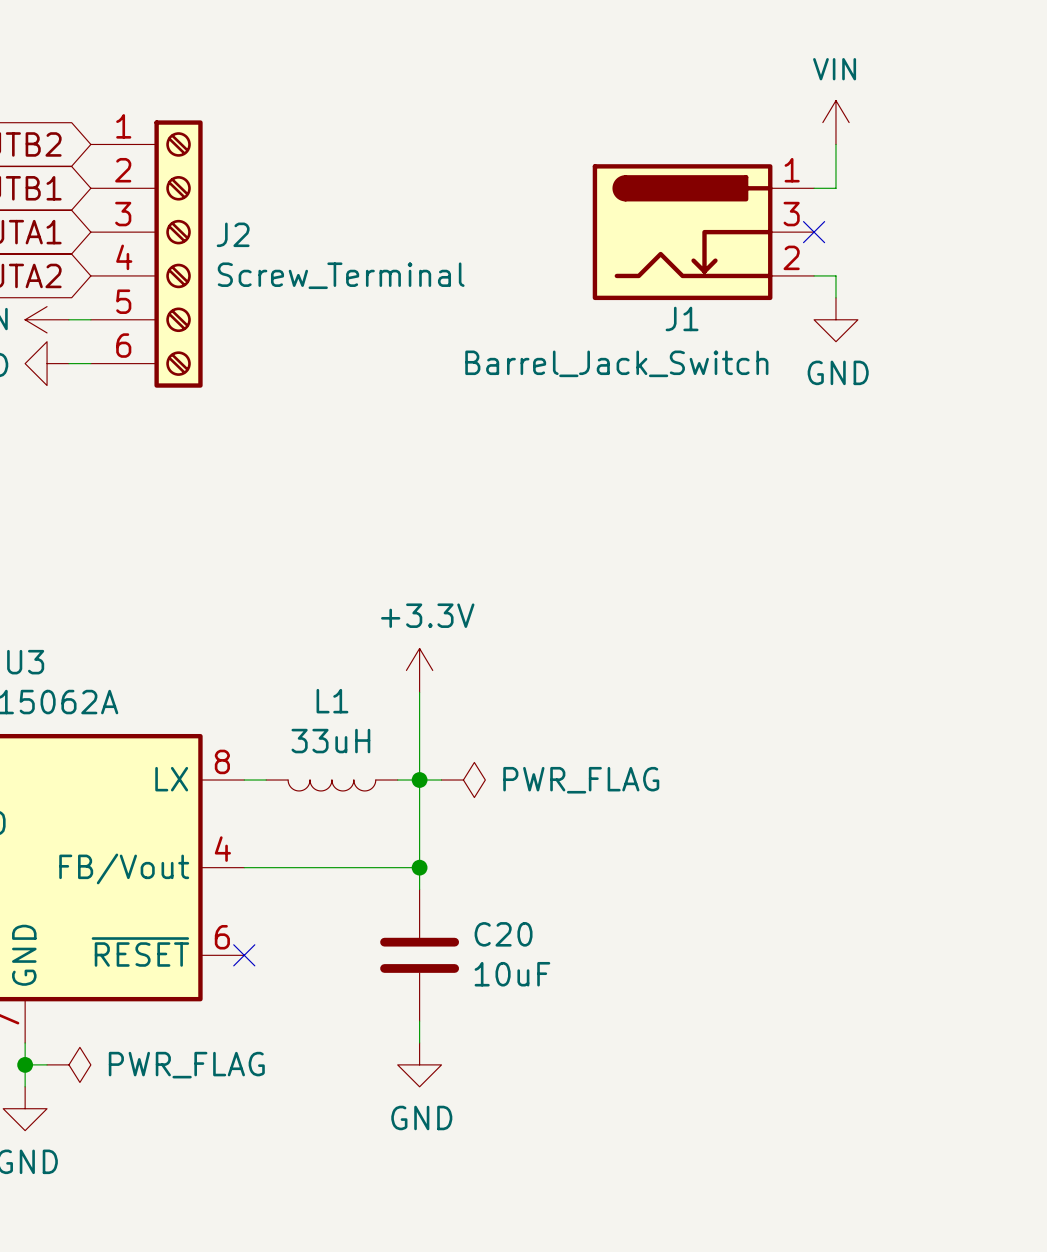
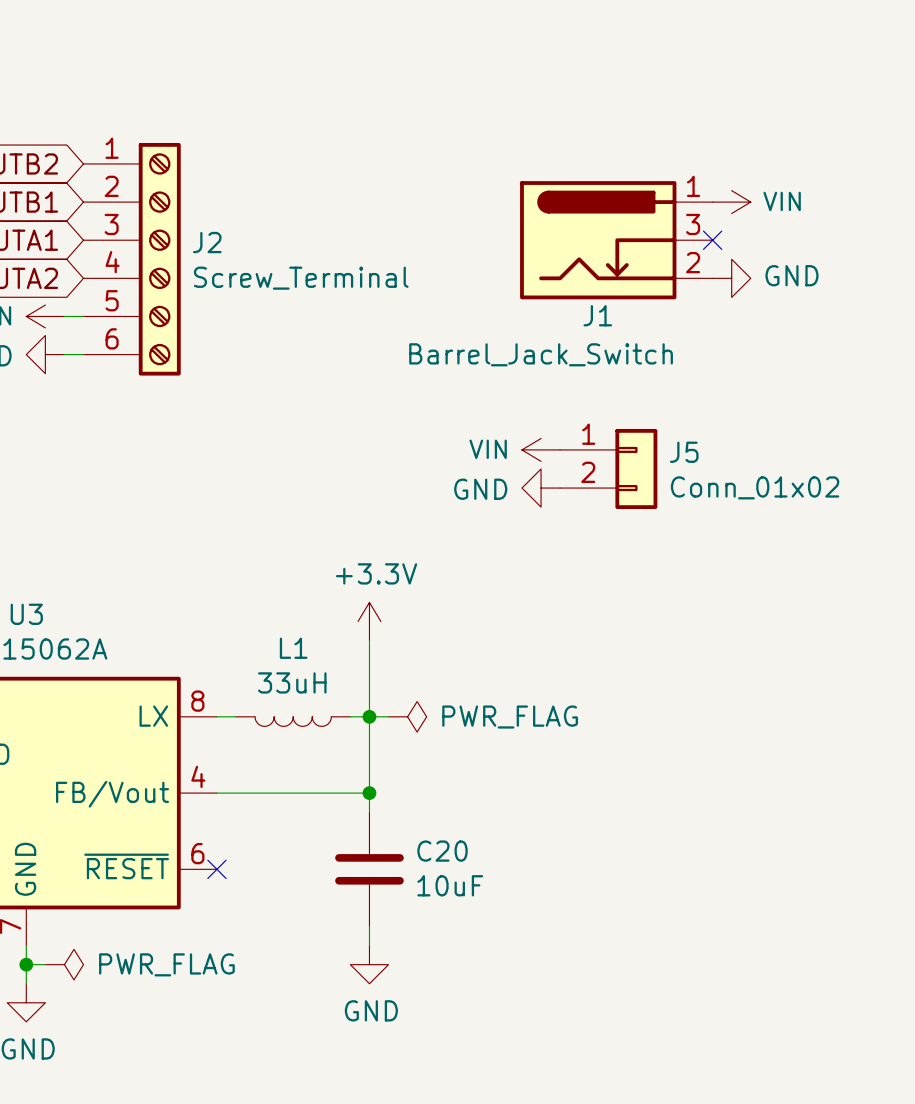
power symbol rotation: 0° (835, 122) -> 90° clockwise (731, 202)
power symbol position: VIN (835, 122) -> VIN (731, 202)
wire: (835, 144) (835, 188) (814, 188) -> none
power symbol rotation: 0° (835, 319) -> 90° counterclockwise (731, 278)
power symbol position: GND (835, 319) -> GND (731, 278)
power symbol: none -> VIN (541, 449)
J5: none -> Conn_01x02 (608, 468)
power symbol: none -> GND (541, 488)

